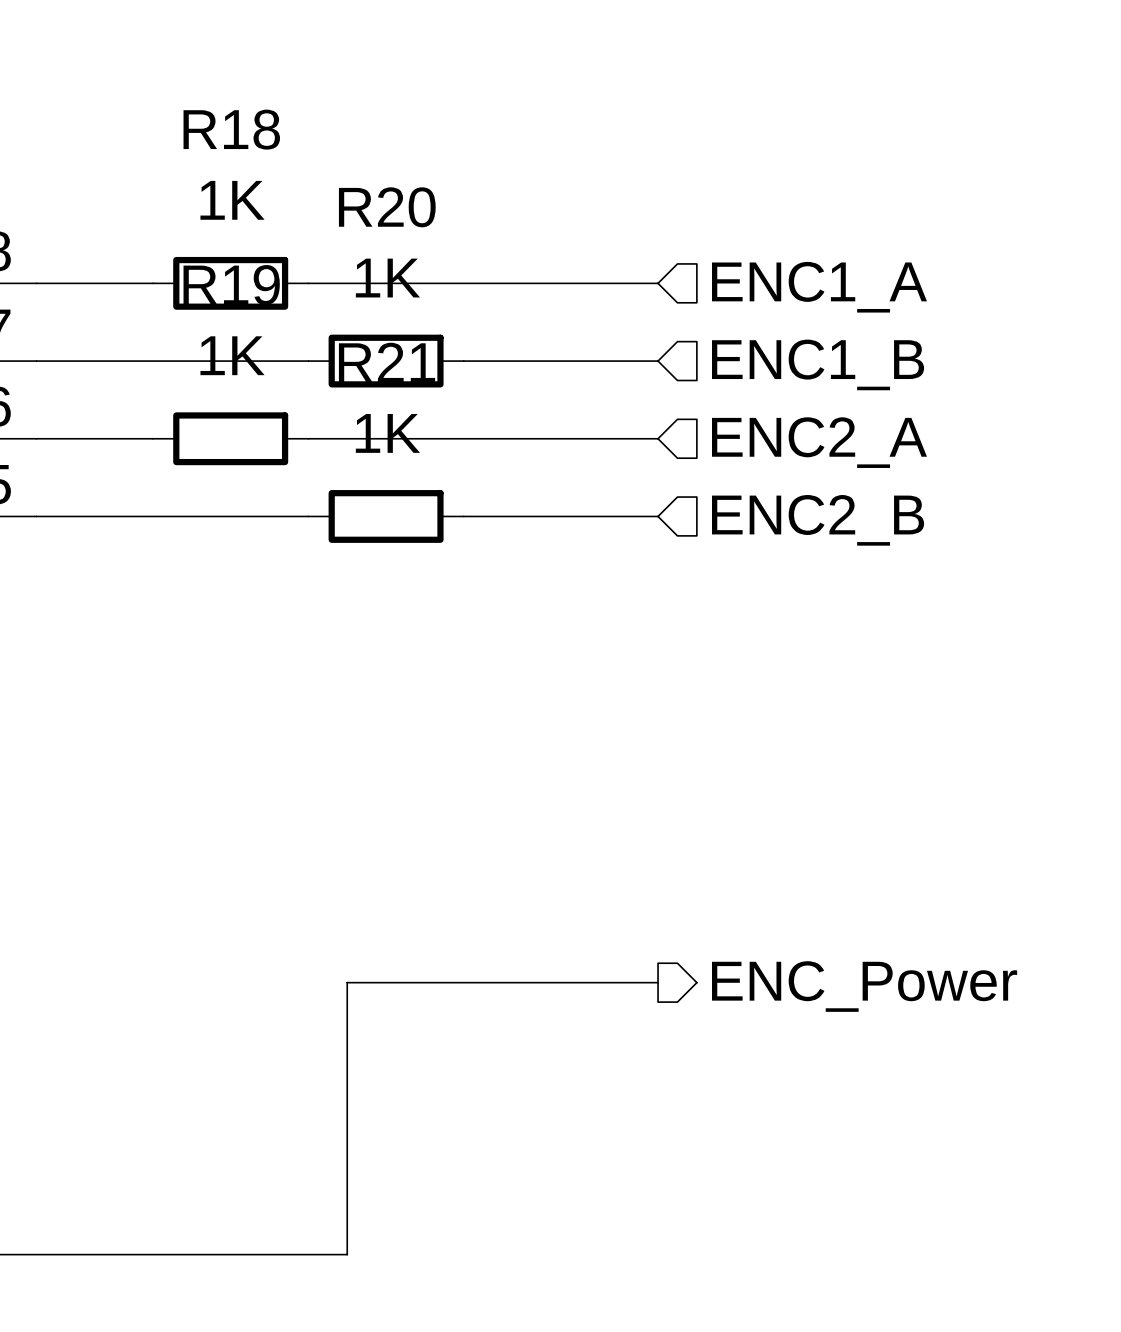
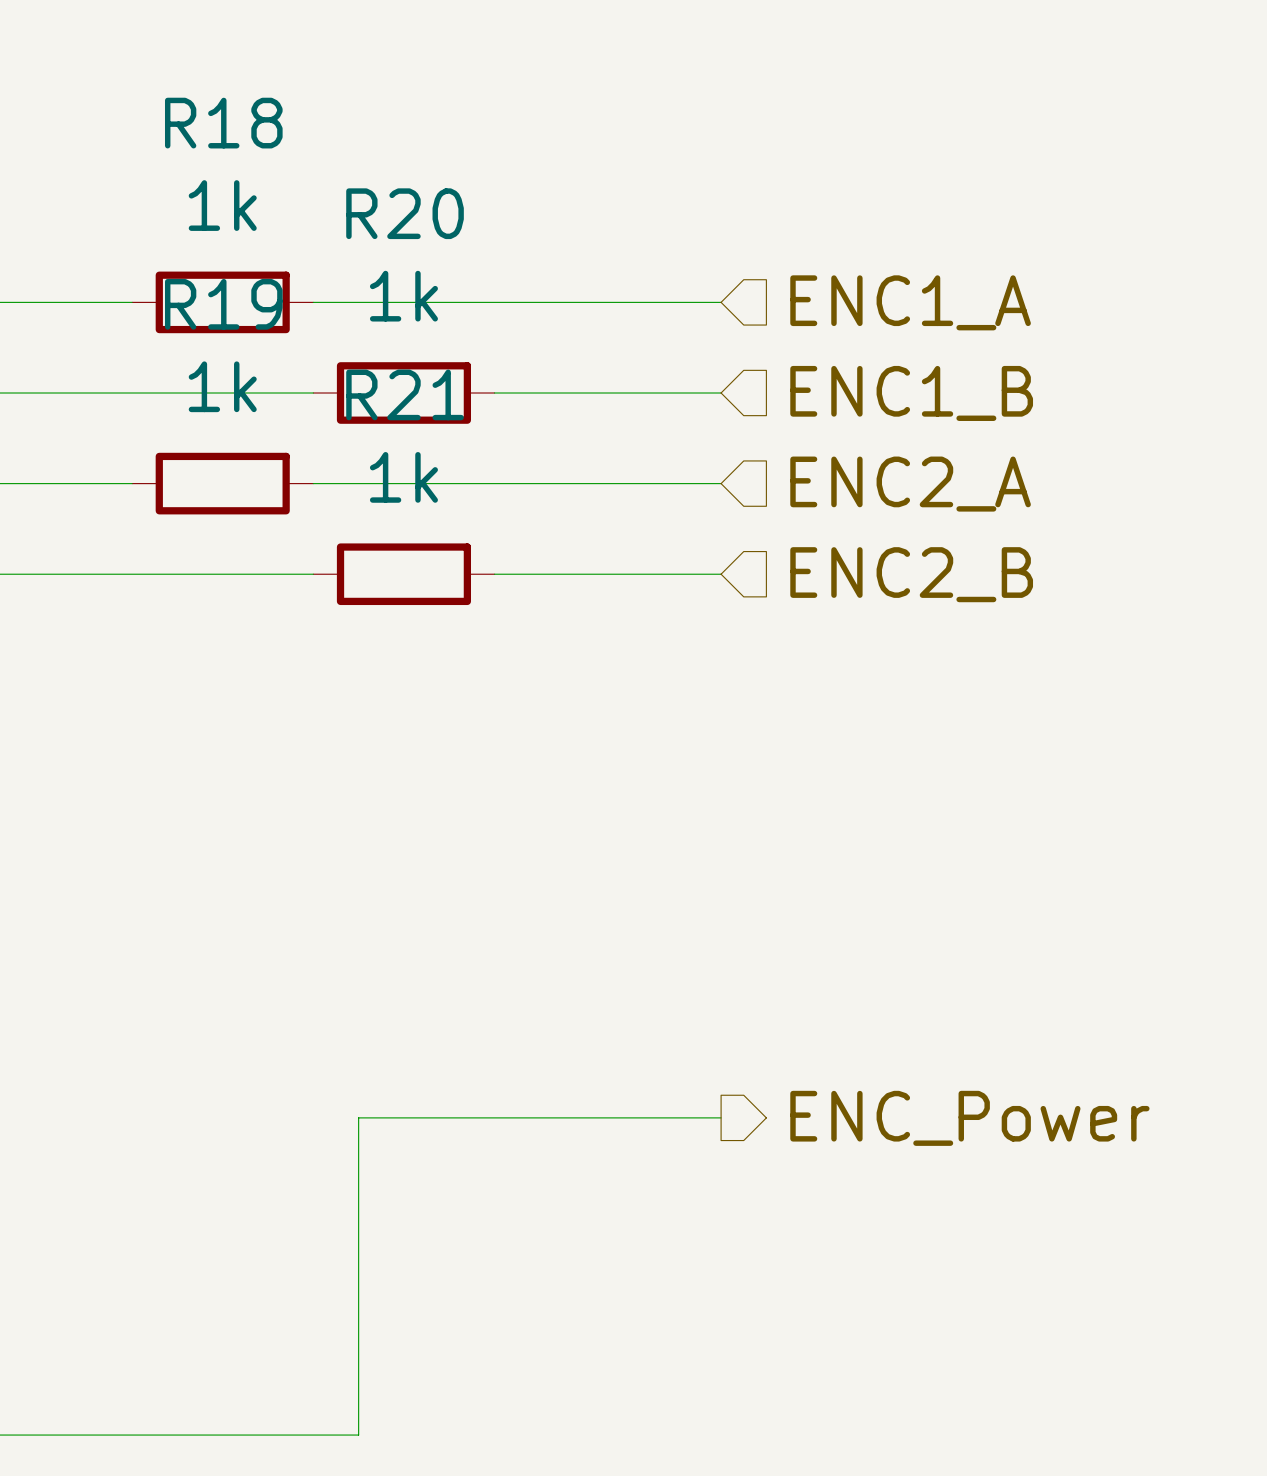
R18 value: 1K (232, 200) -> 1k (222, 205)
R20 value: 1K (387, 278) -> 1k (403, 296)
R19 value: 1K (232, 355) -> 1k (222, 386)
R21 value: 1K (387, 433) -> 1k (403, 477)

